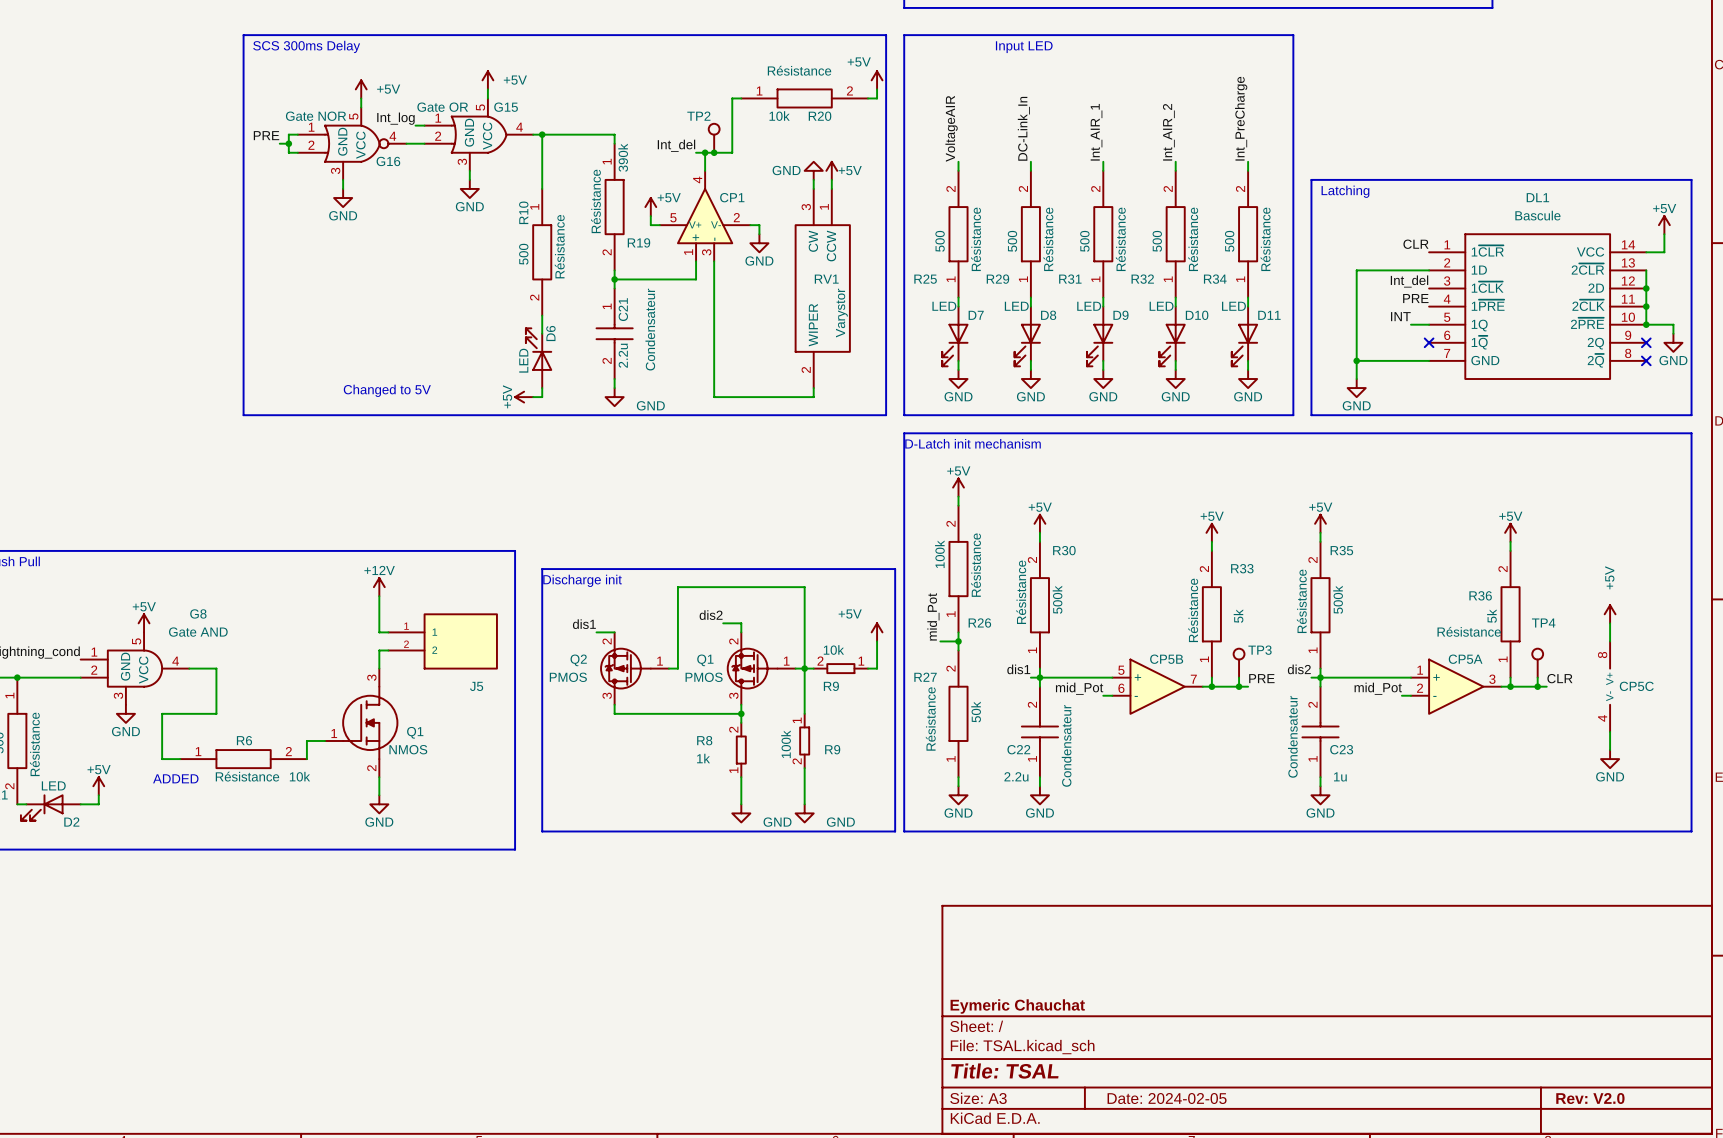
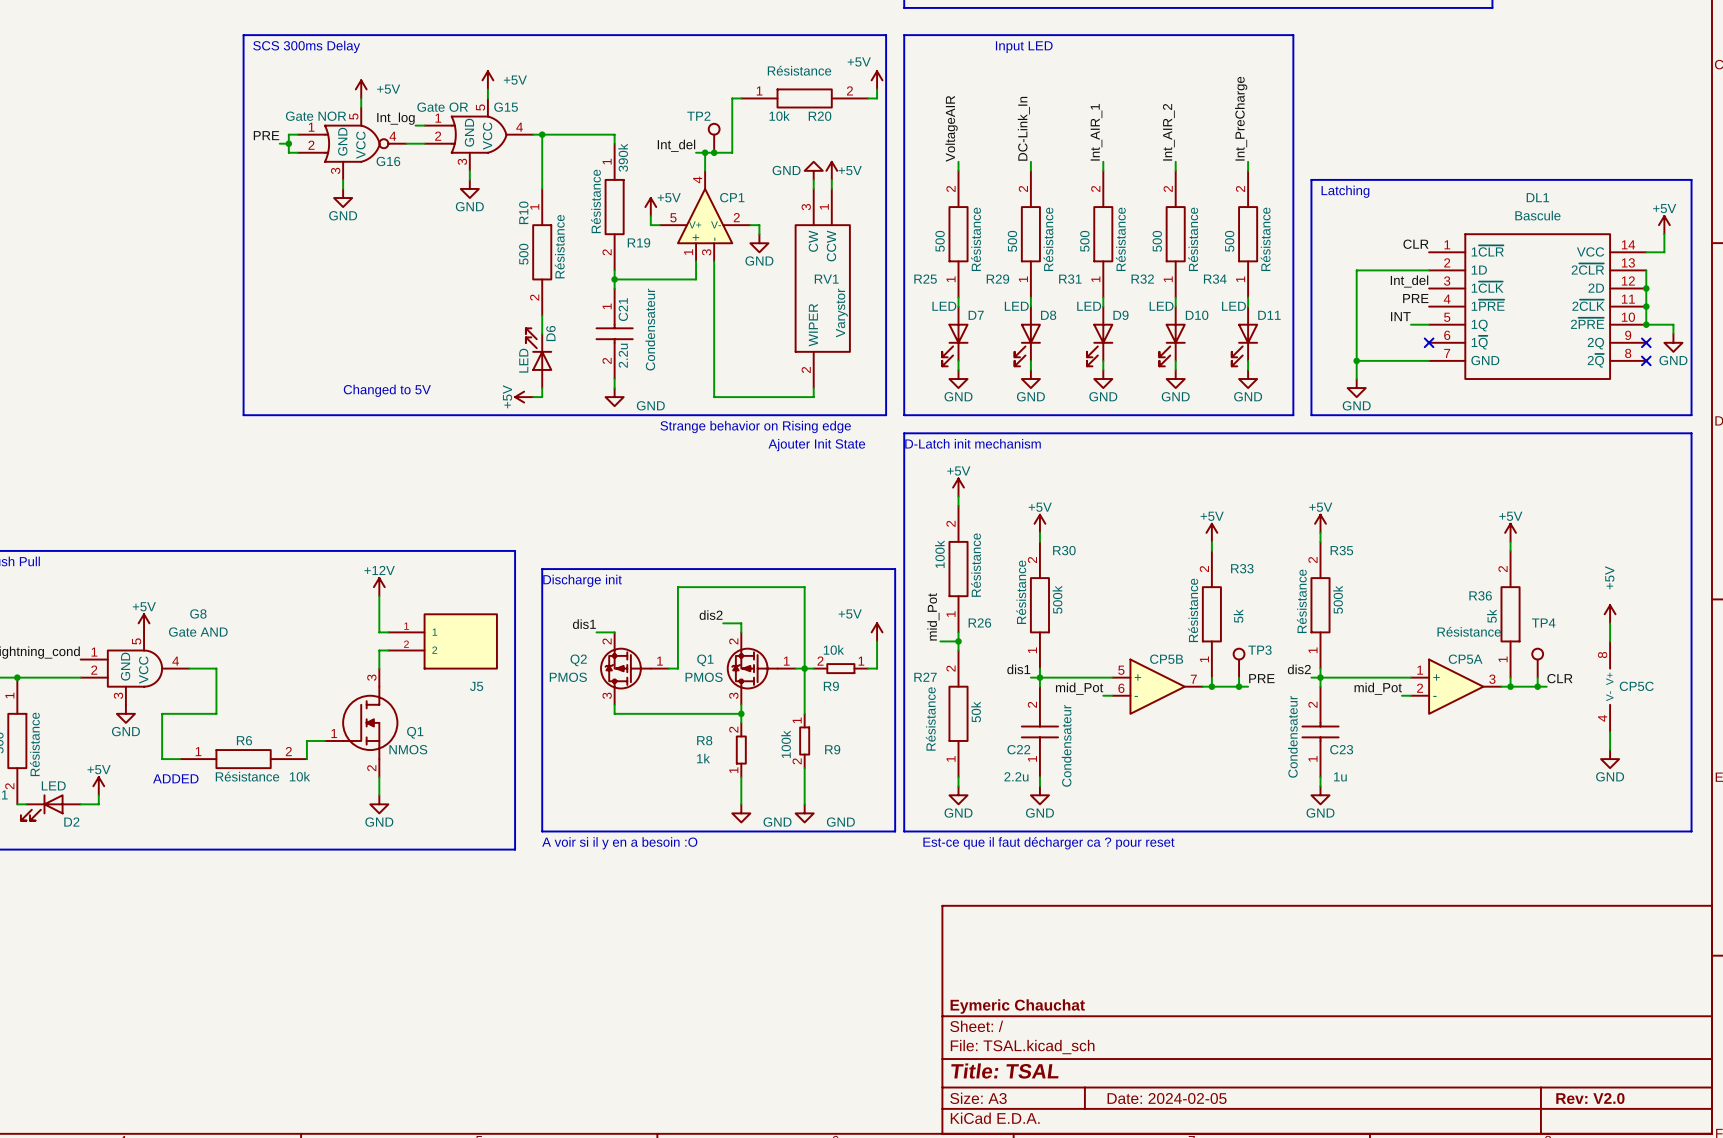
text: none -> Strange behavior on Rising edge (755, 427)
text: none -> Ajouter Init State (816, 445)
text: none -> A voir si il y en a besoin :O (619, 843)
text: none -> Est-ce que il faut décharger ca ? pour reset (1048, 843)

